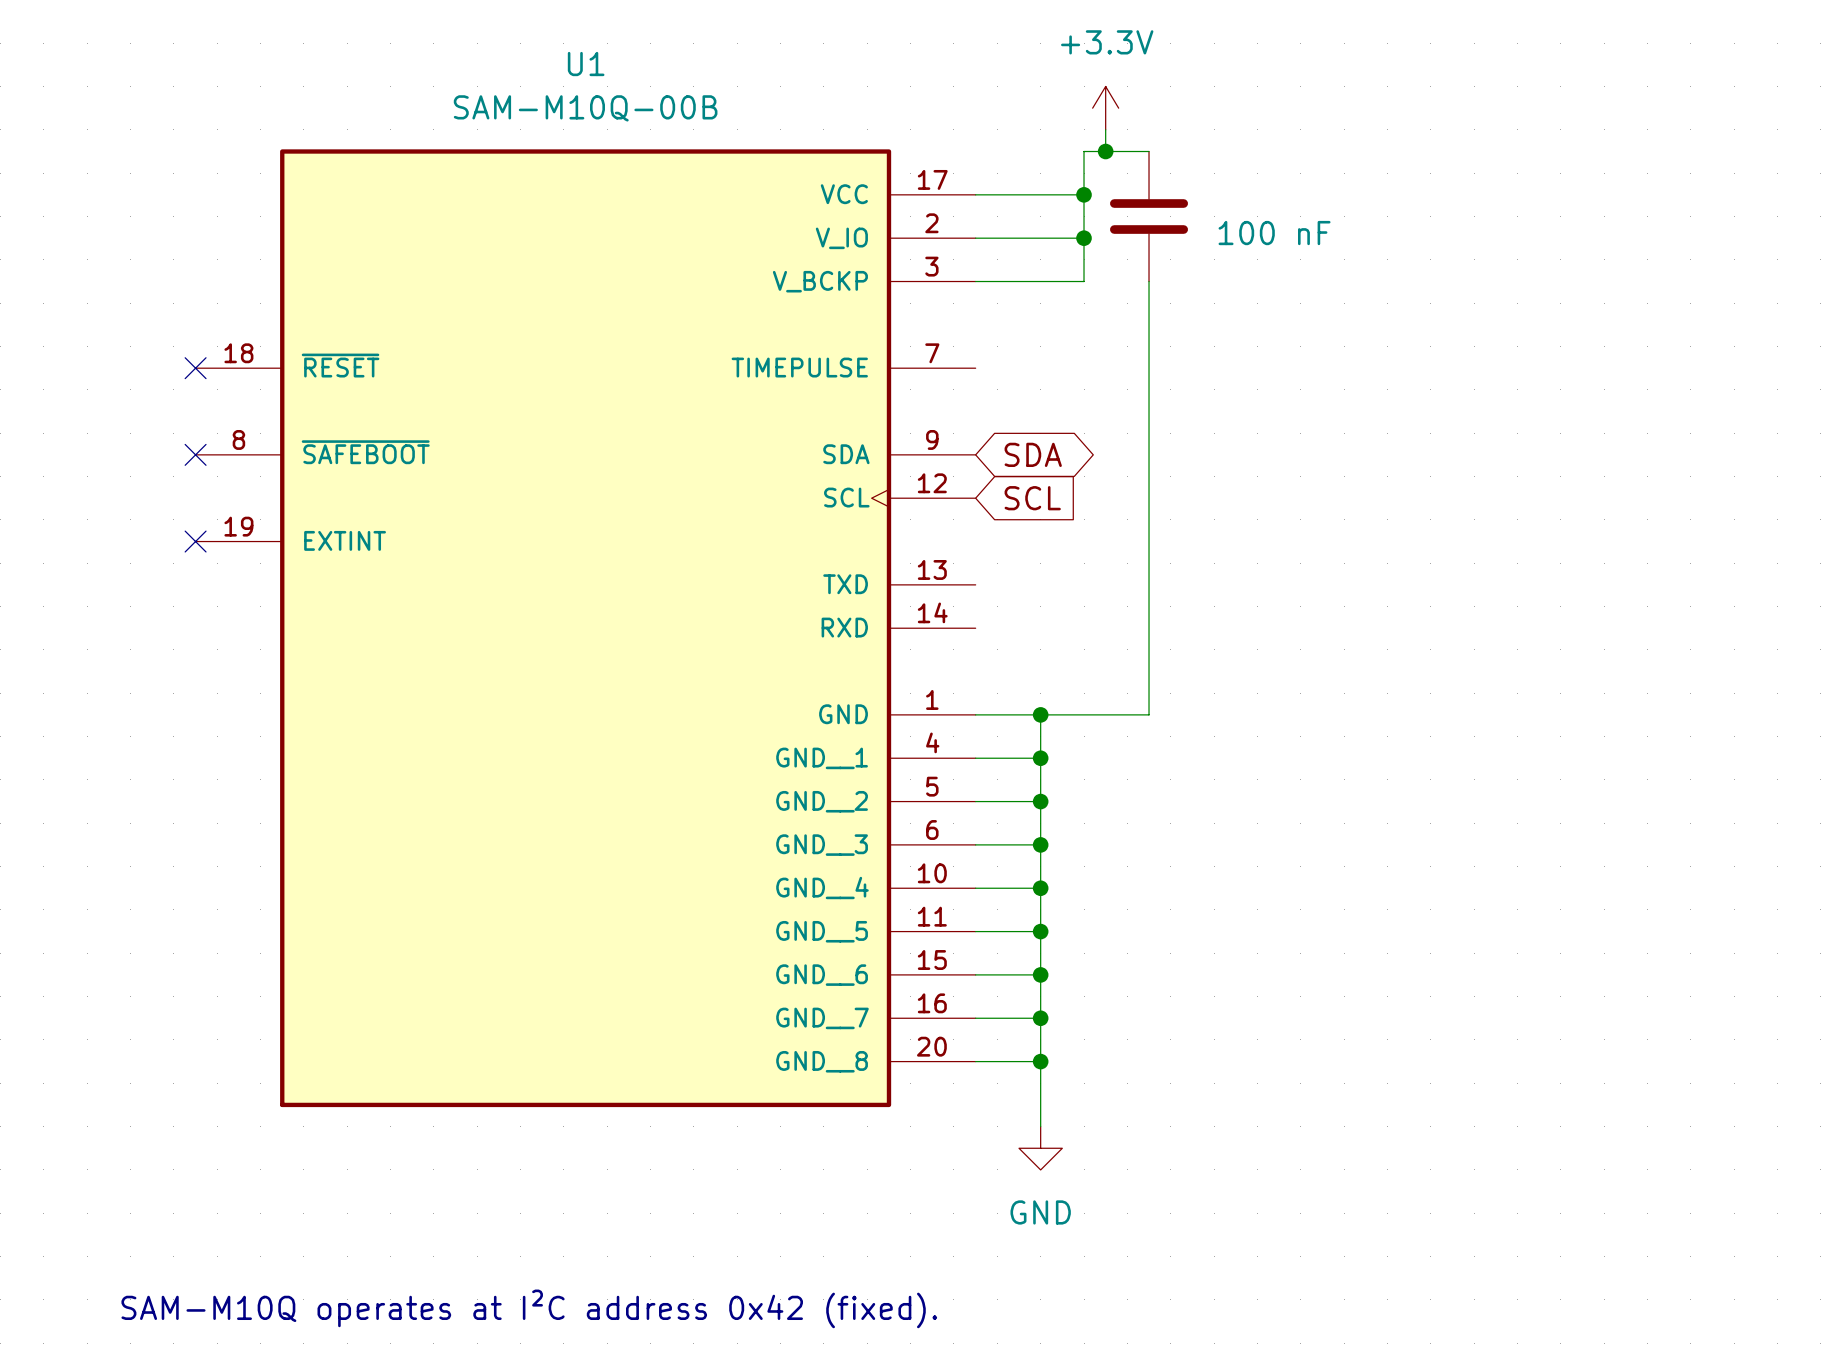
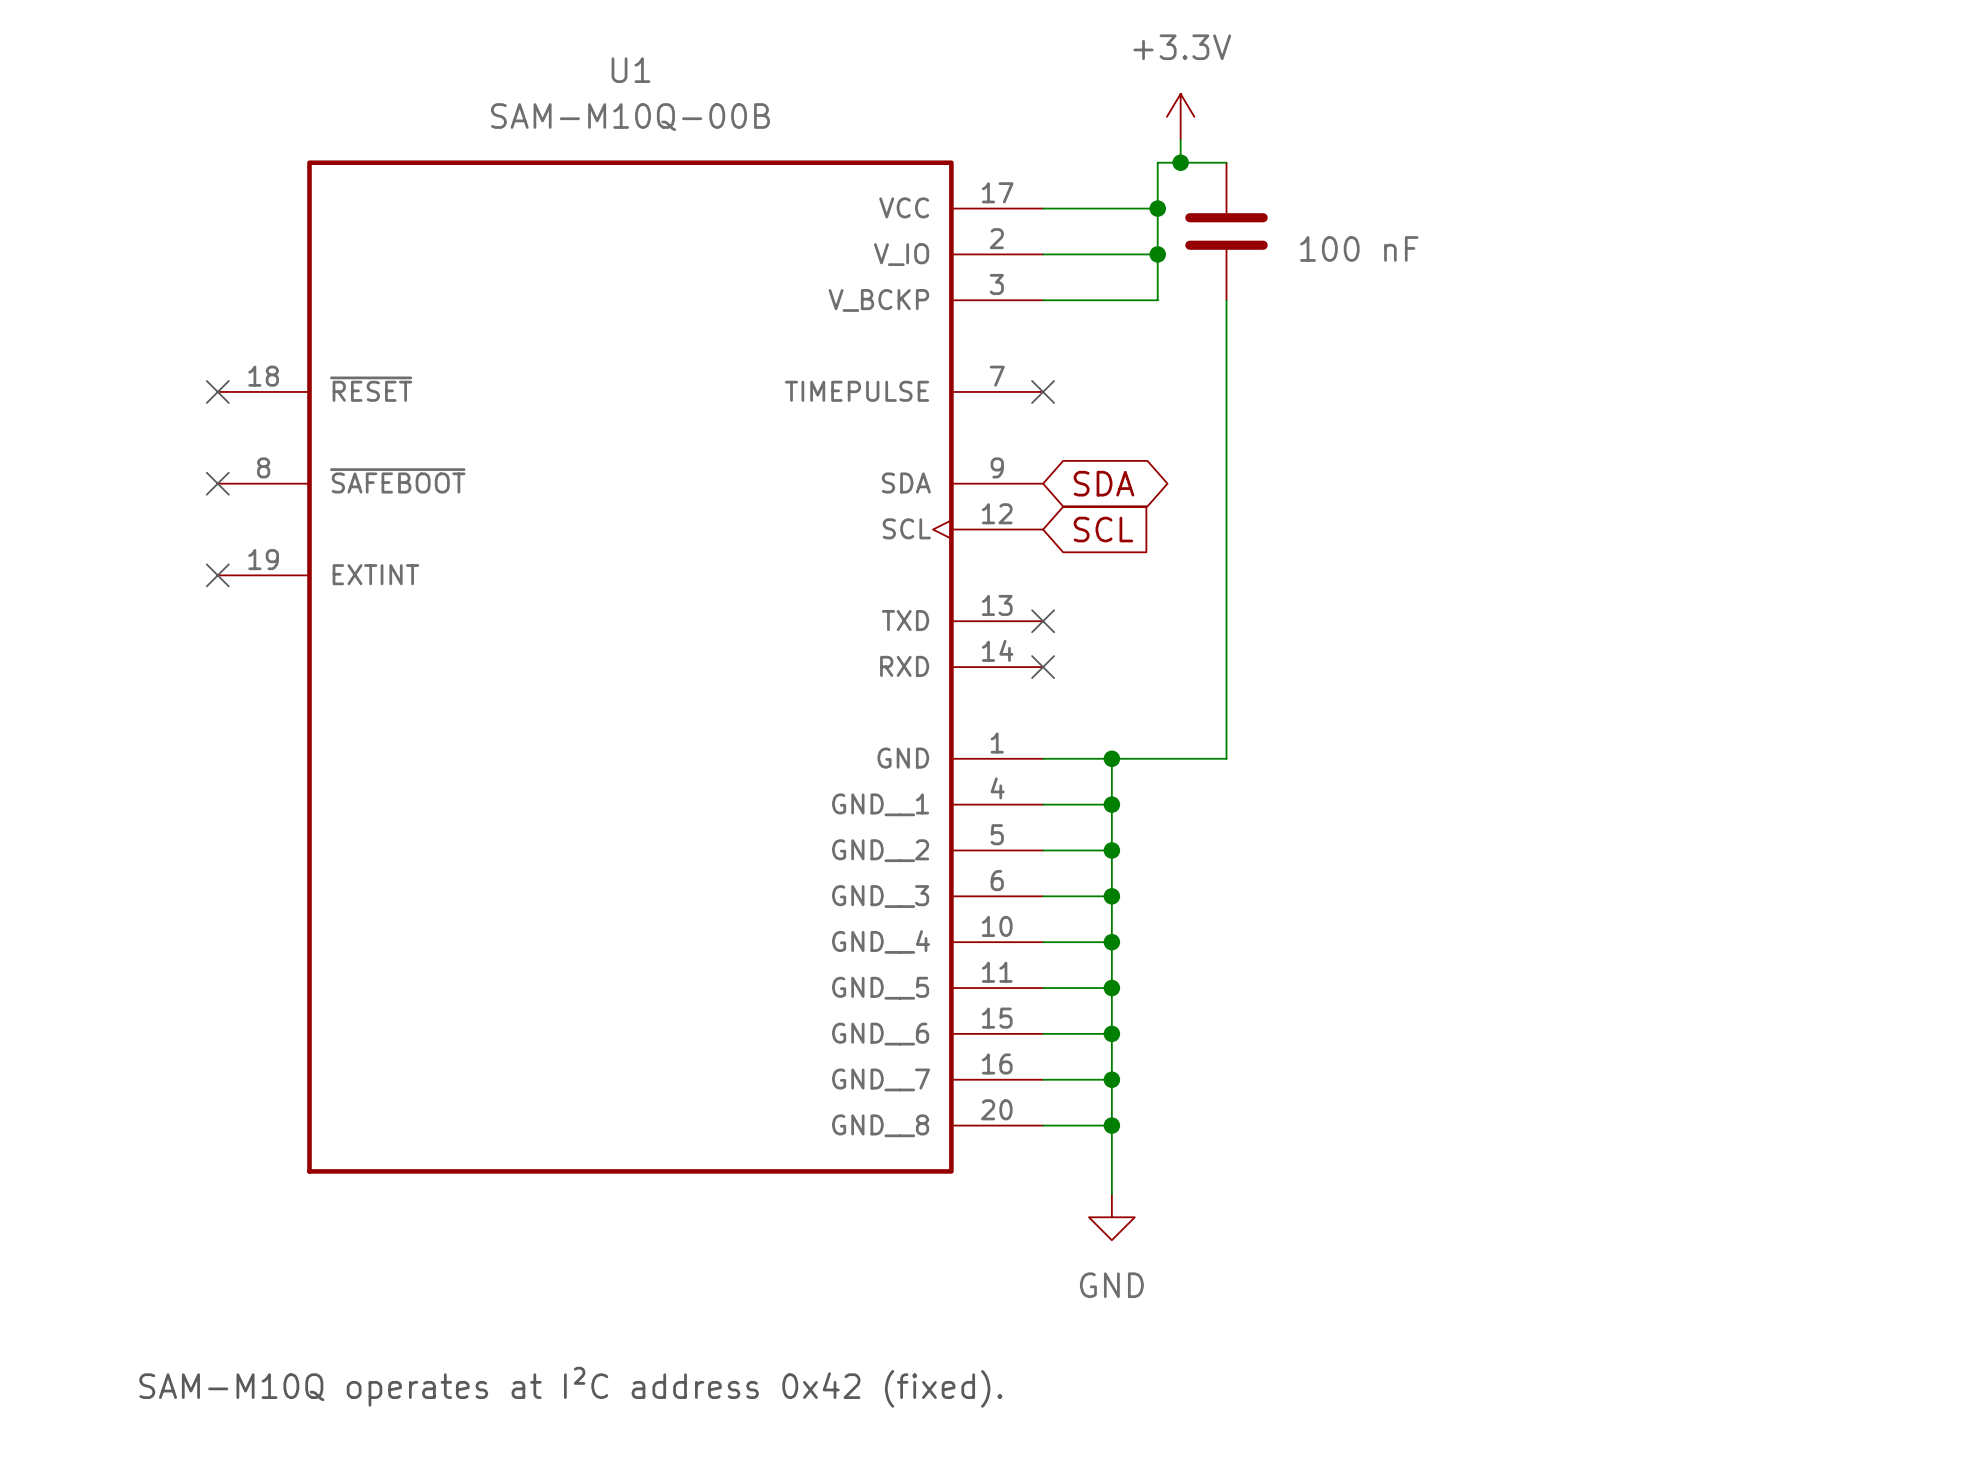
no-connect mark: none -> (1043, 391)
no-connect mark: none -> (1043, 621)
no-connect mark: none -> (1043, 667)

